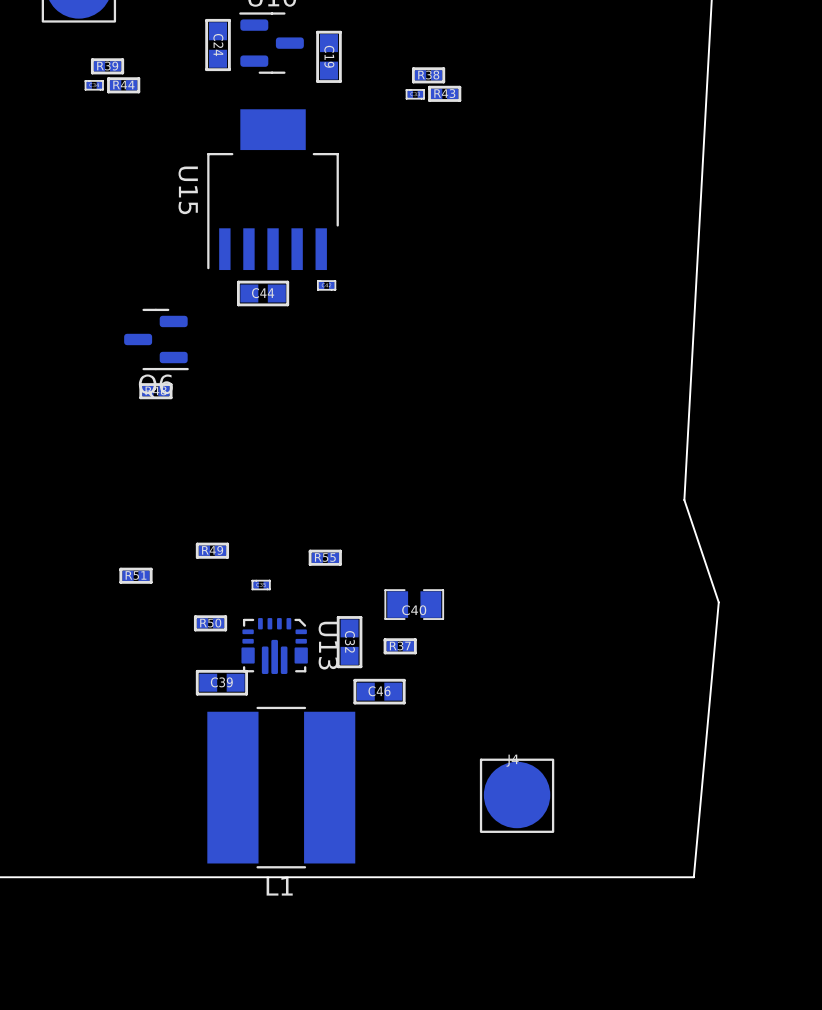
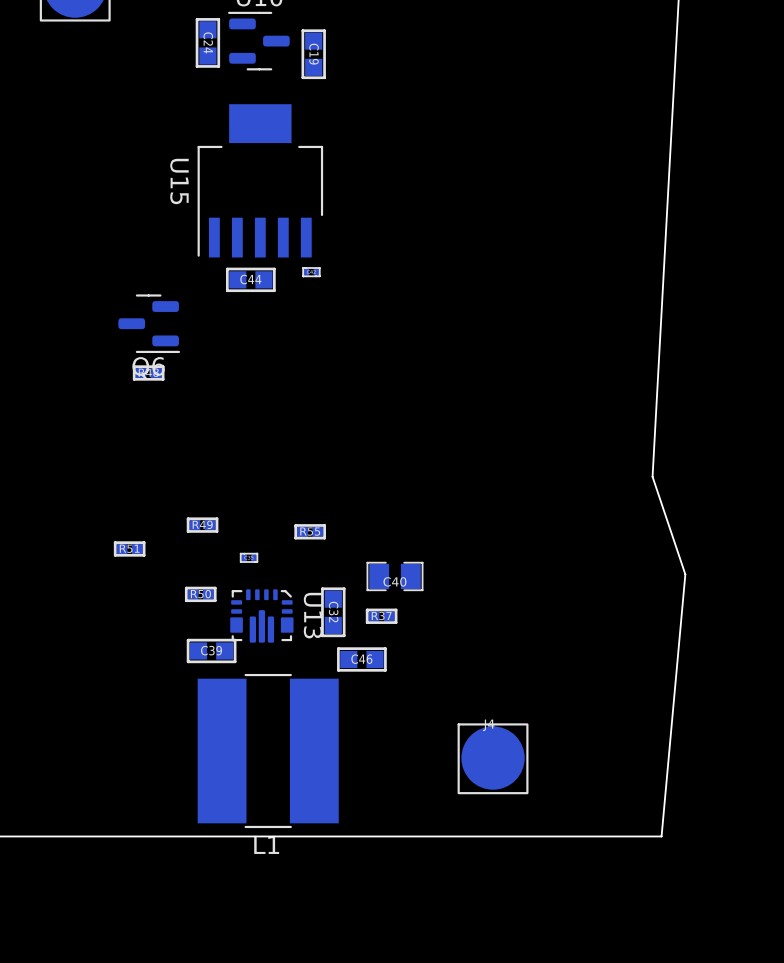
R39: (107, 66) -> none
R38: (428, 75) -> none
part: (94, 85) -> none
R44: (123, 85) -> none
R43: (444, 93) -> none
part: (415, 94) -> none

